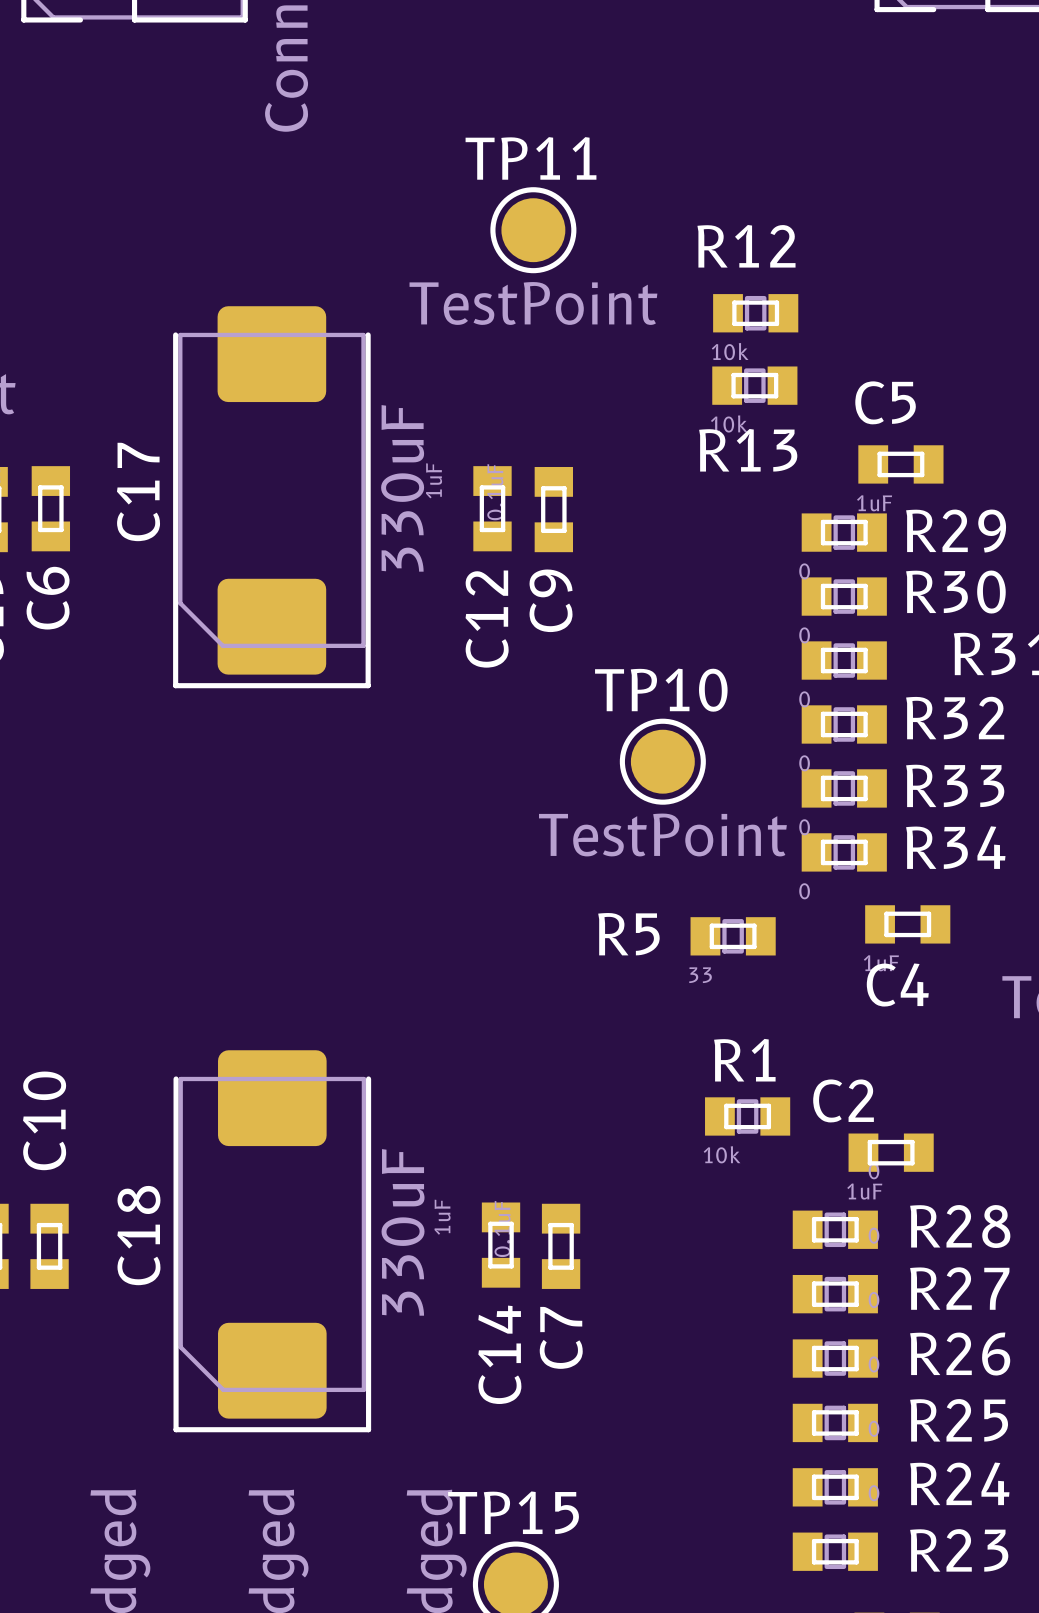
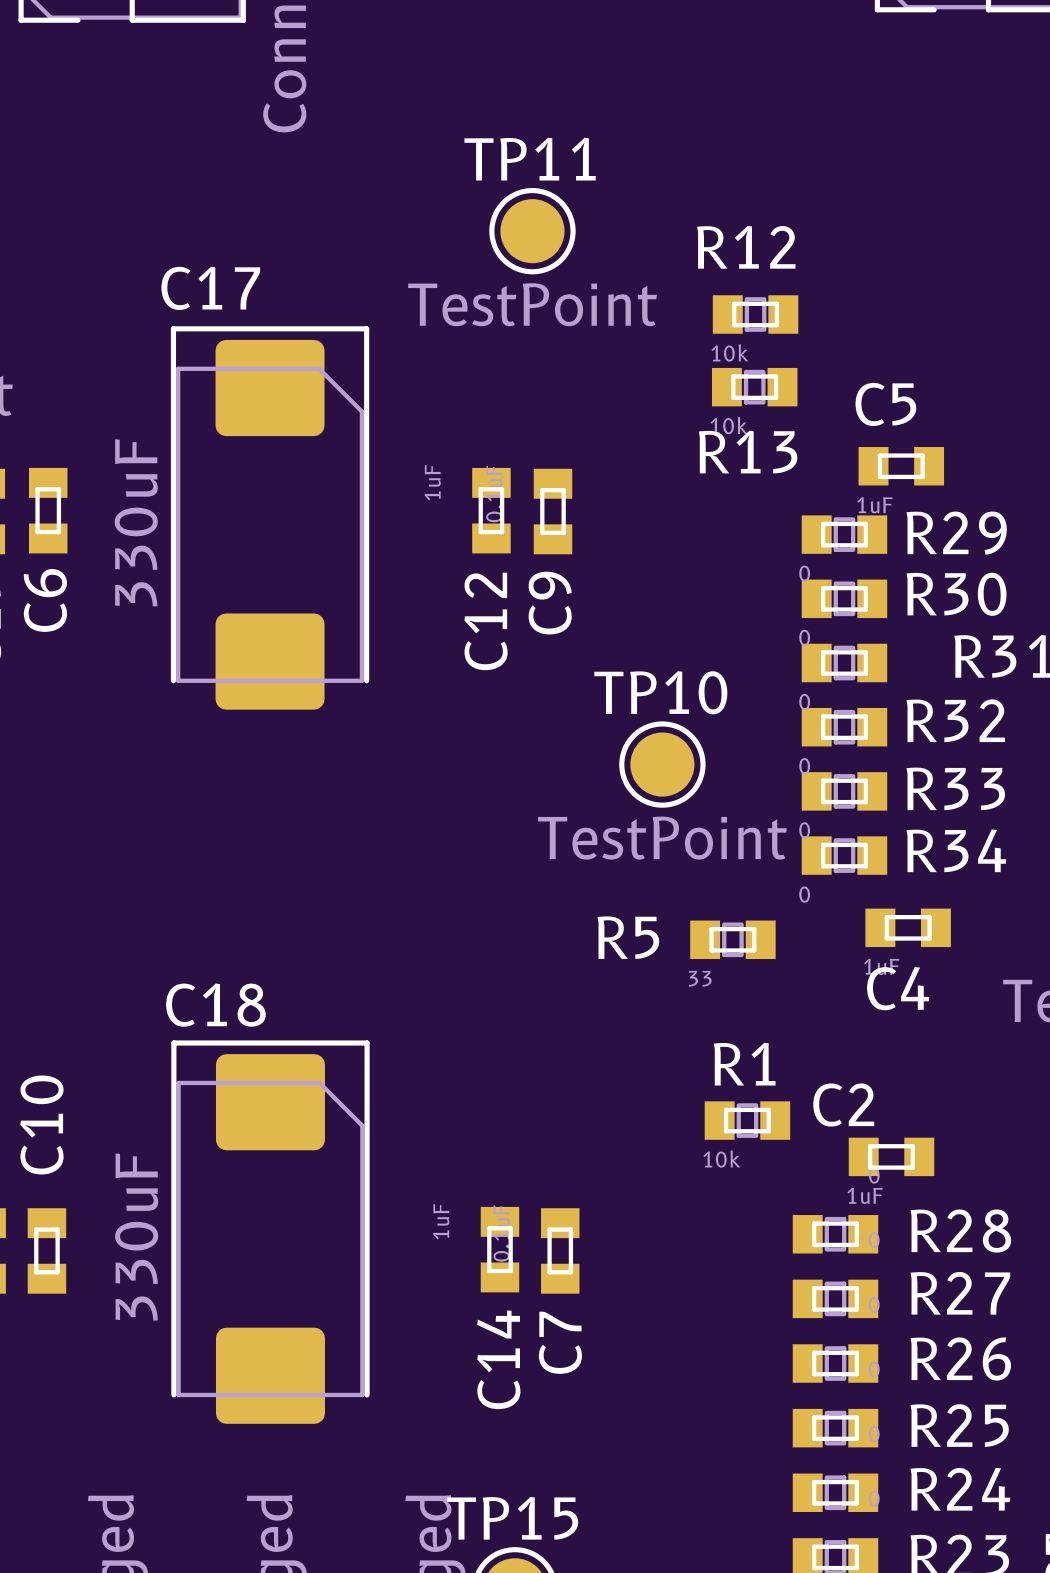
C17 name position: C17 (138, 491) -> C17 (210, 288)
C17 rotation: 0° (271, 497) -> 180° (270, 517)
C18 name position: C18 (138, 1235) -> C18 (215, 1005)
C18 rotation: 0° (272, 1241) -> 180° (270, 1232)

